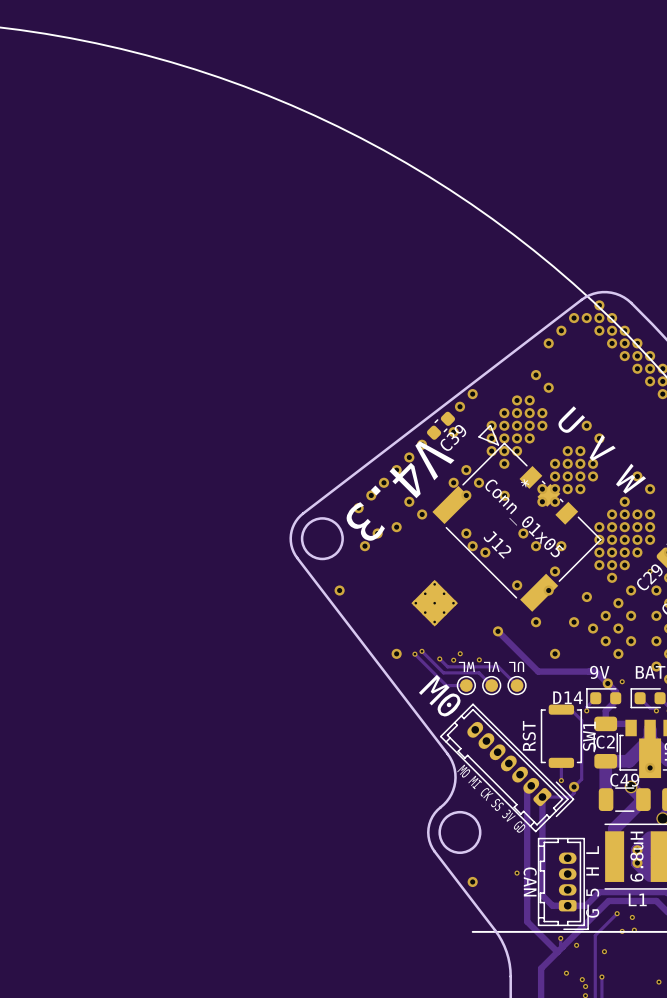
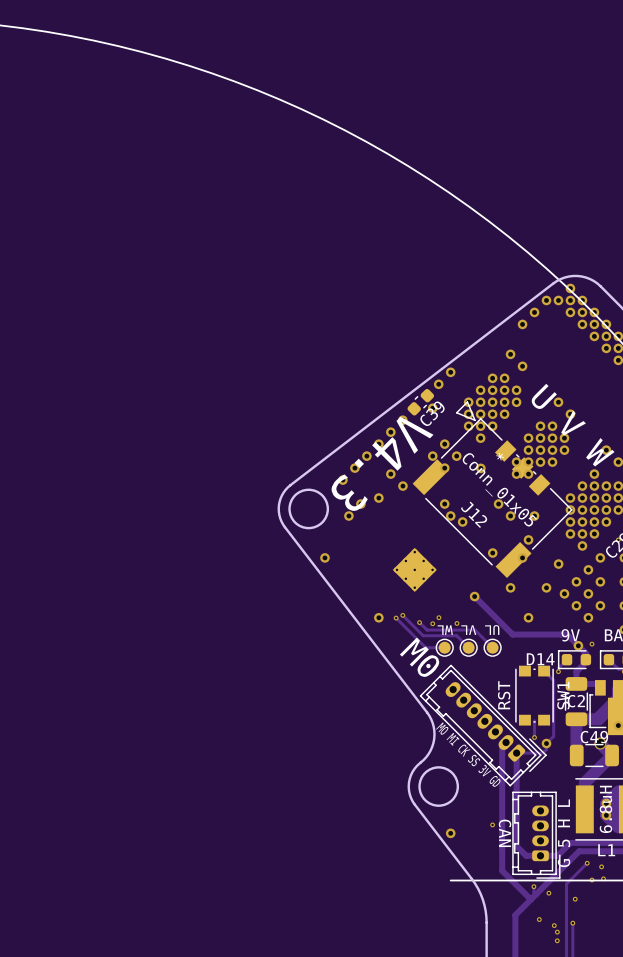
SW1 footprint: [540, 704, 583, 768] -> [515, 665, 554, 726]

